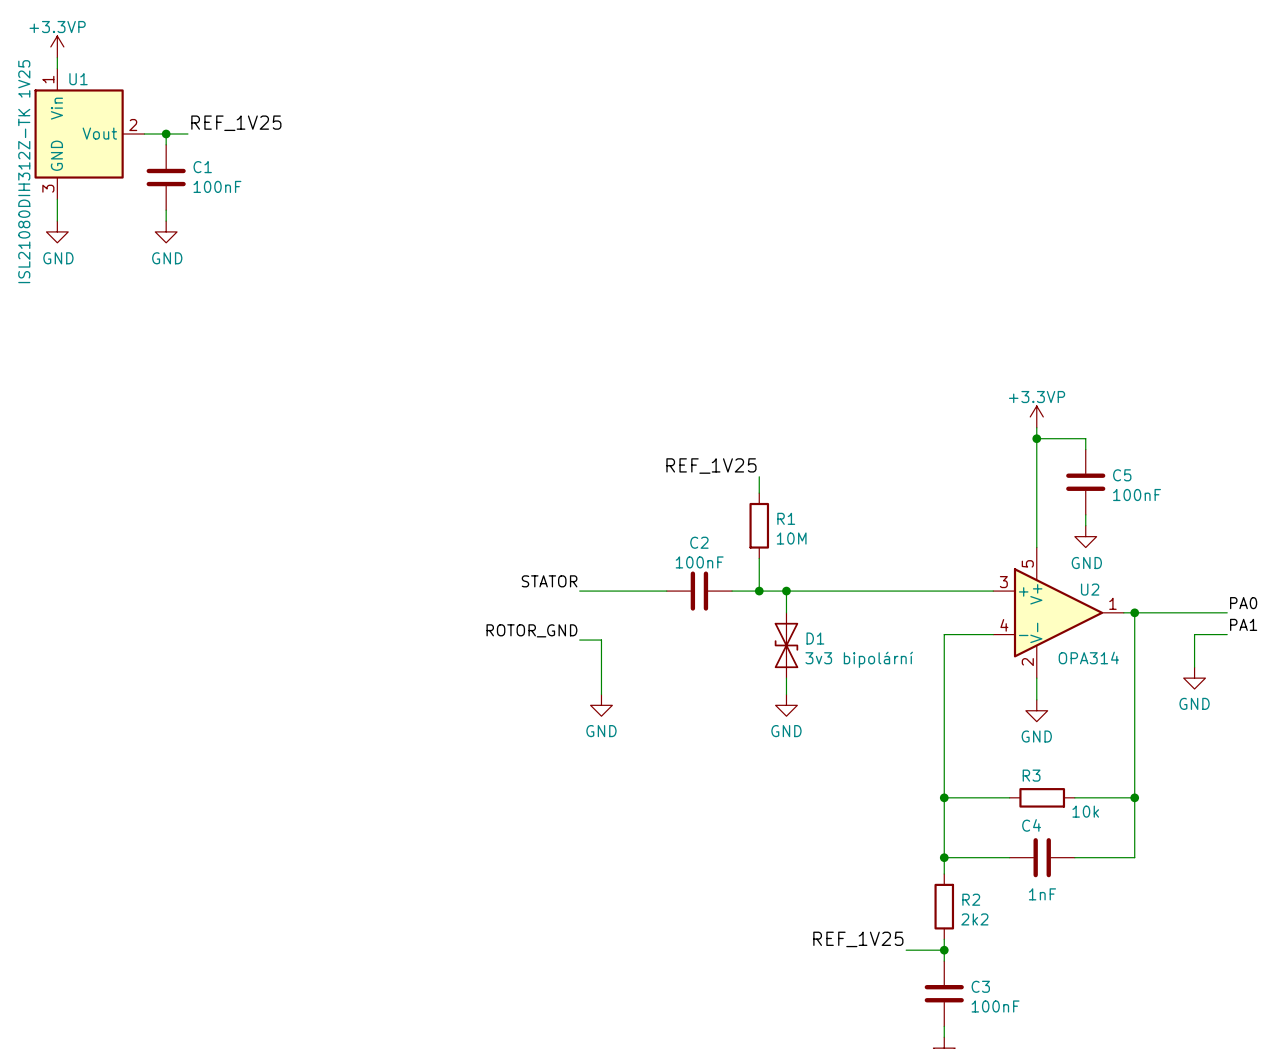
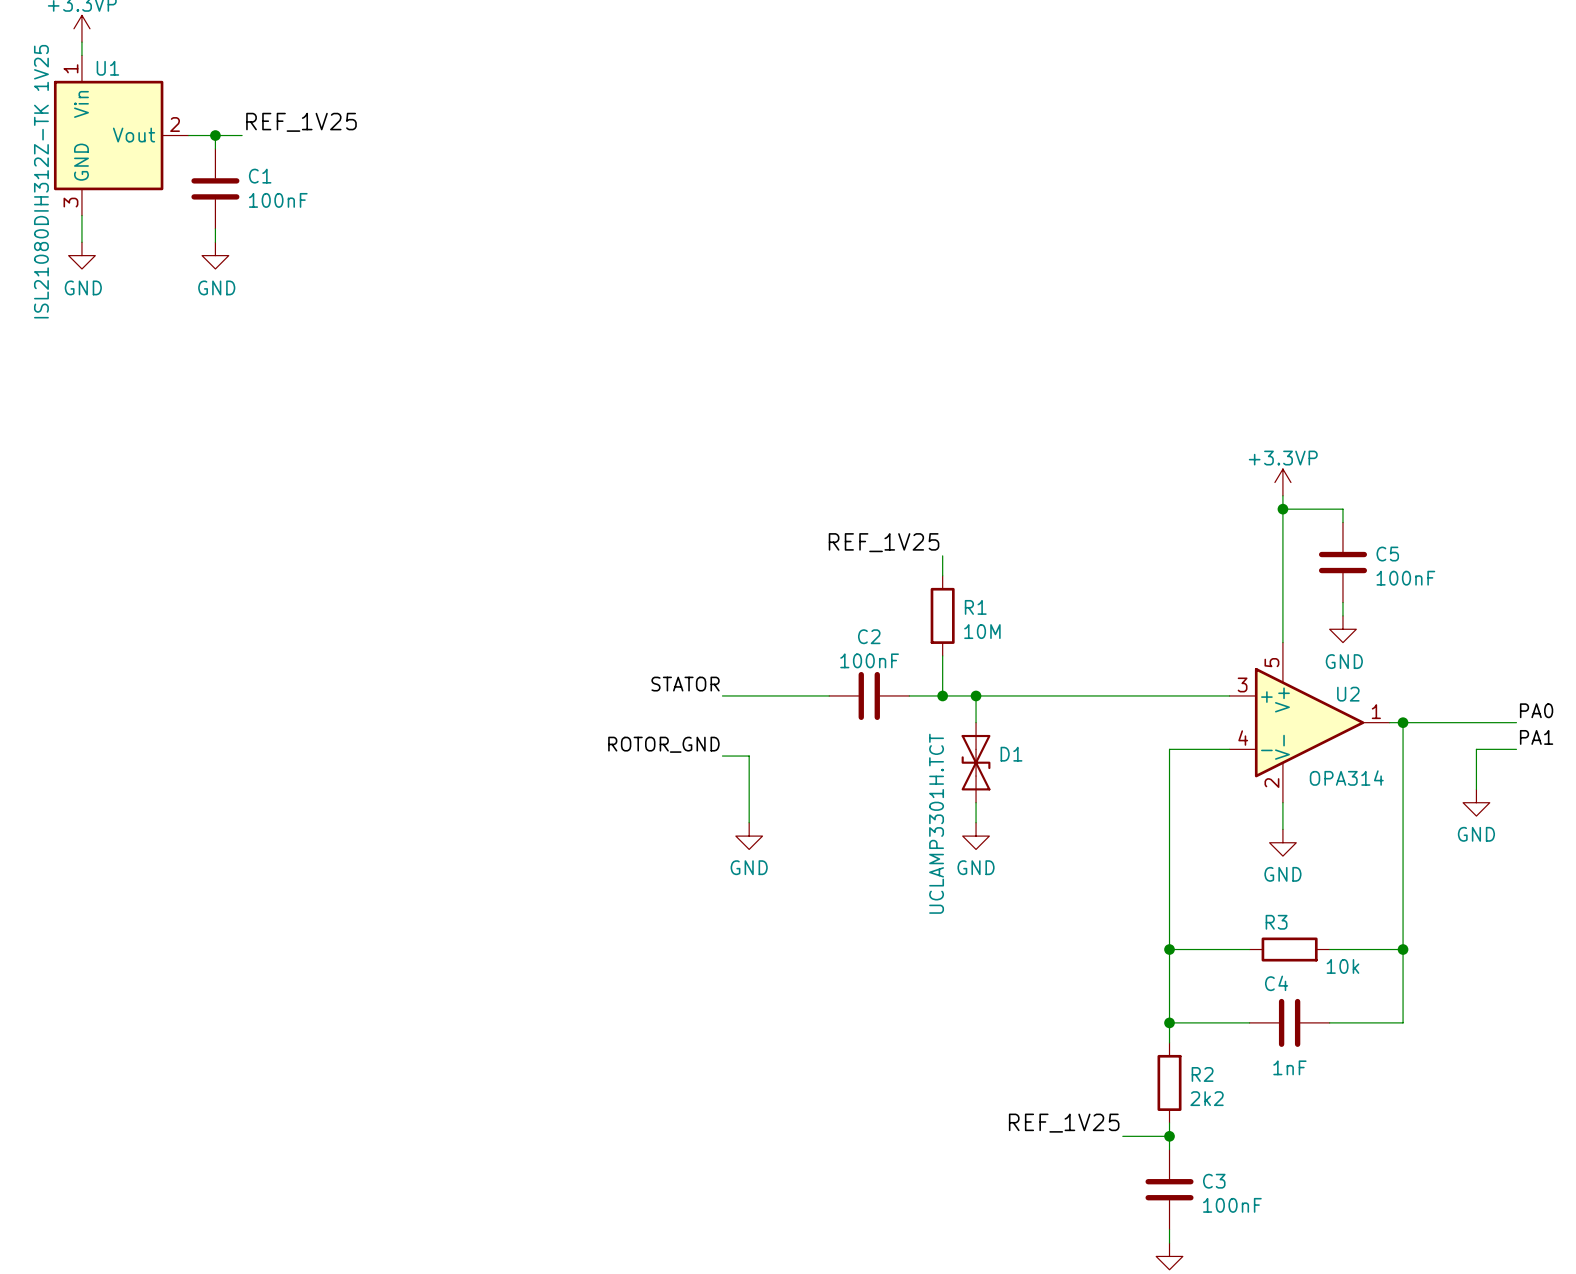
D1 value: 3v3 bipolární (859, 659) -> UCLAMP3301H.TCT (936, 823)

